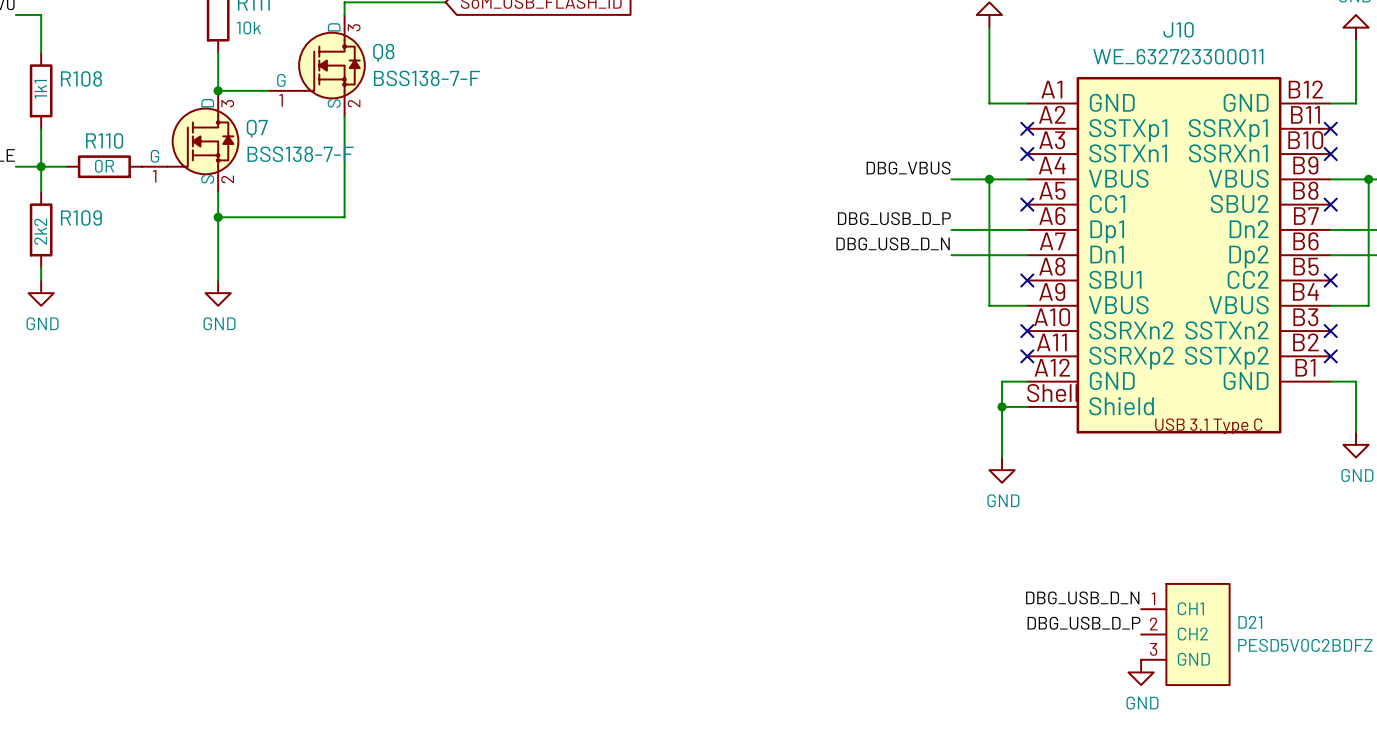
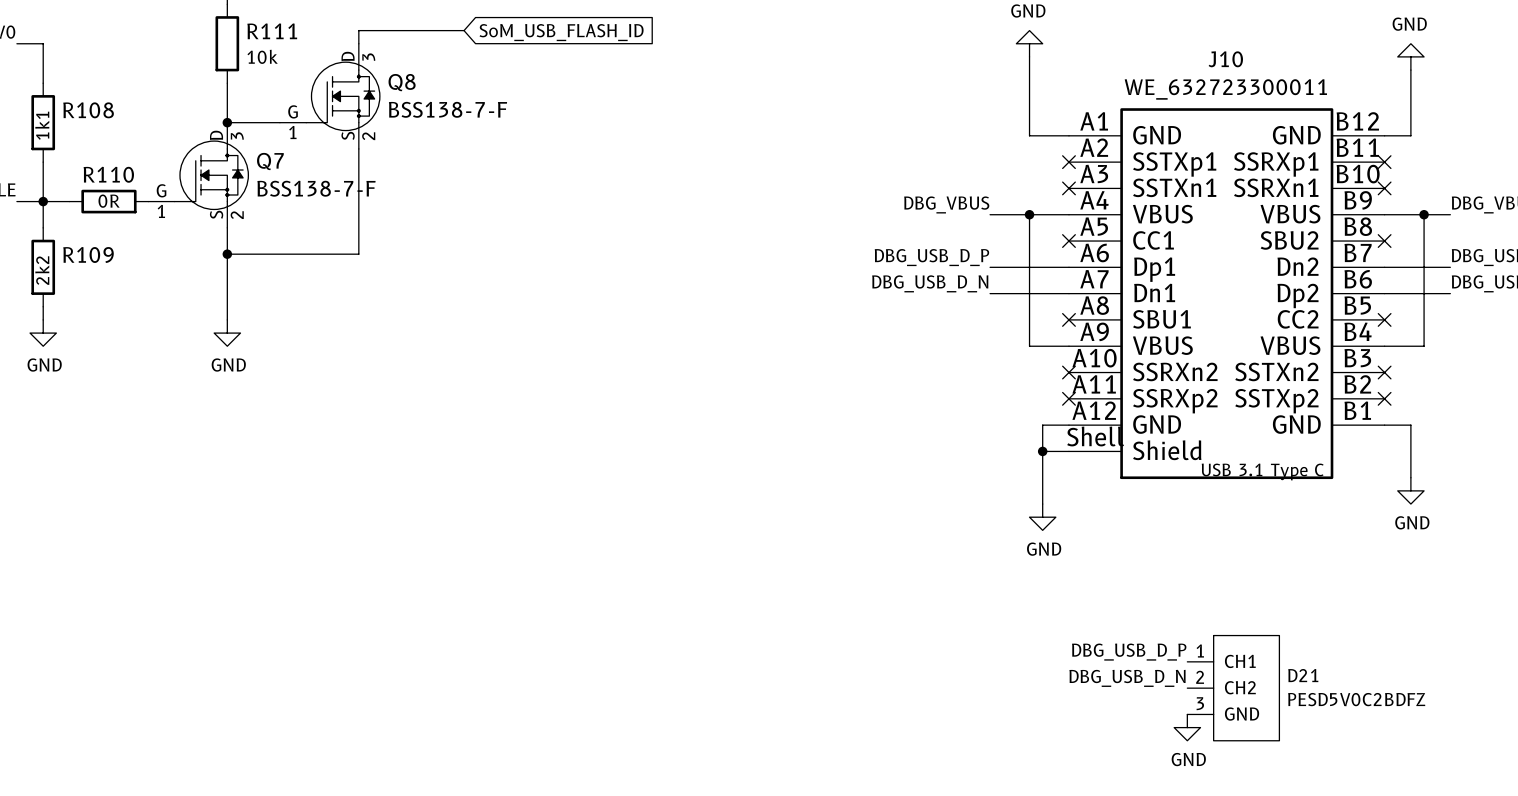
label: DBG_USB_D_N (1082, 597) -> DBG_USB_D_P (1129, 652)
label: DBG_USB_D_P (1084, 623) -> DBG_USB_D_N (1127, 678)

